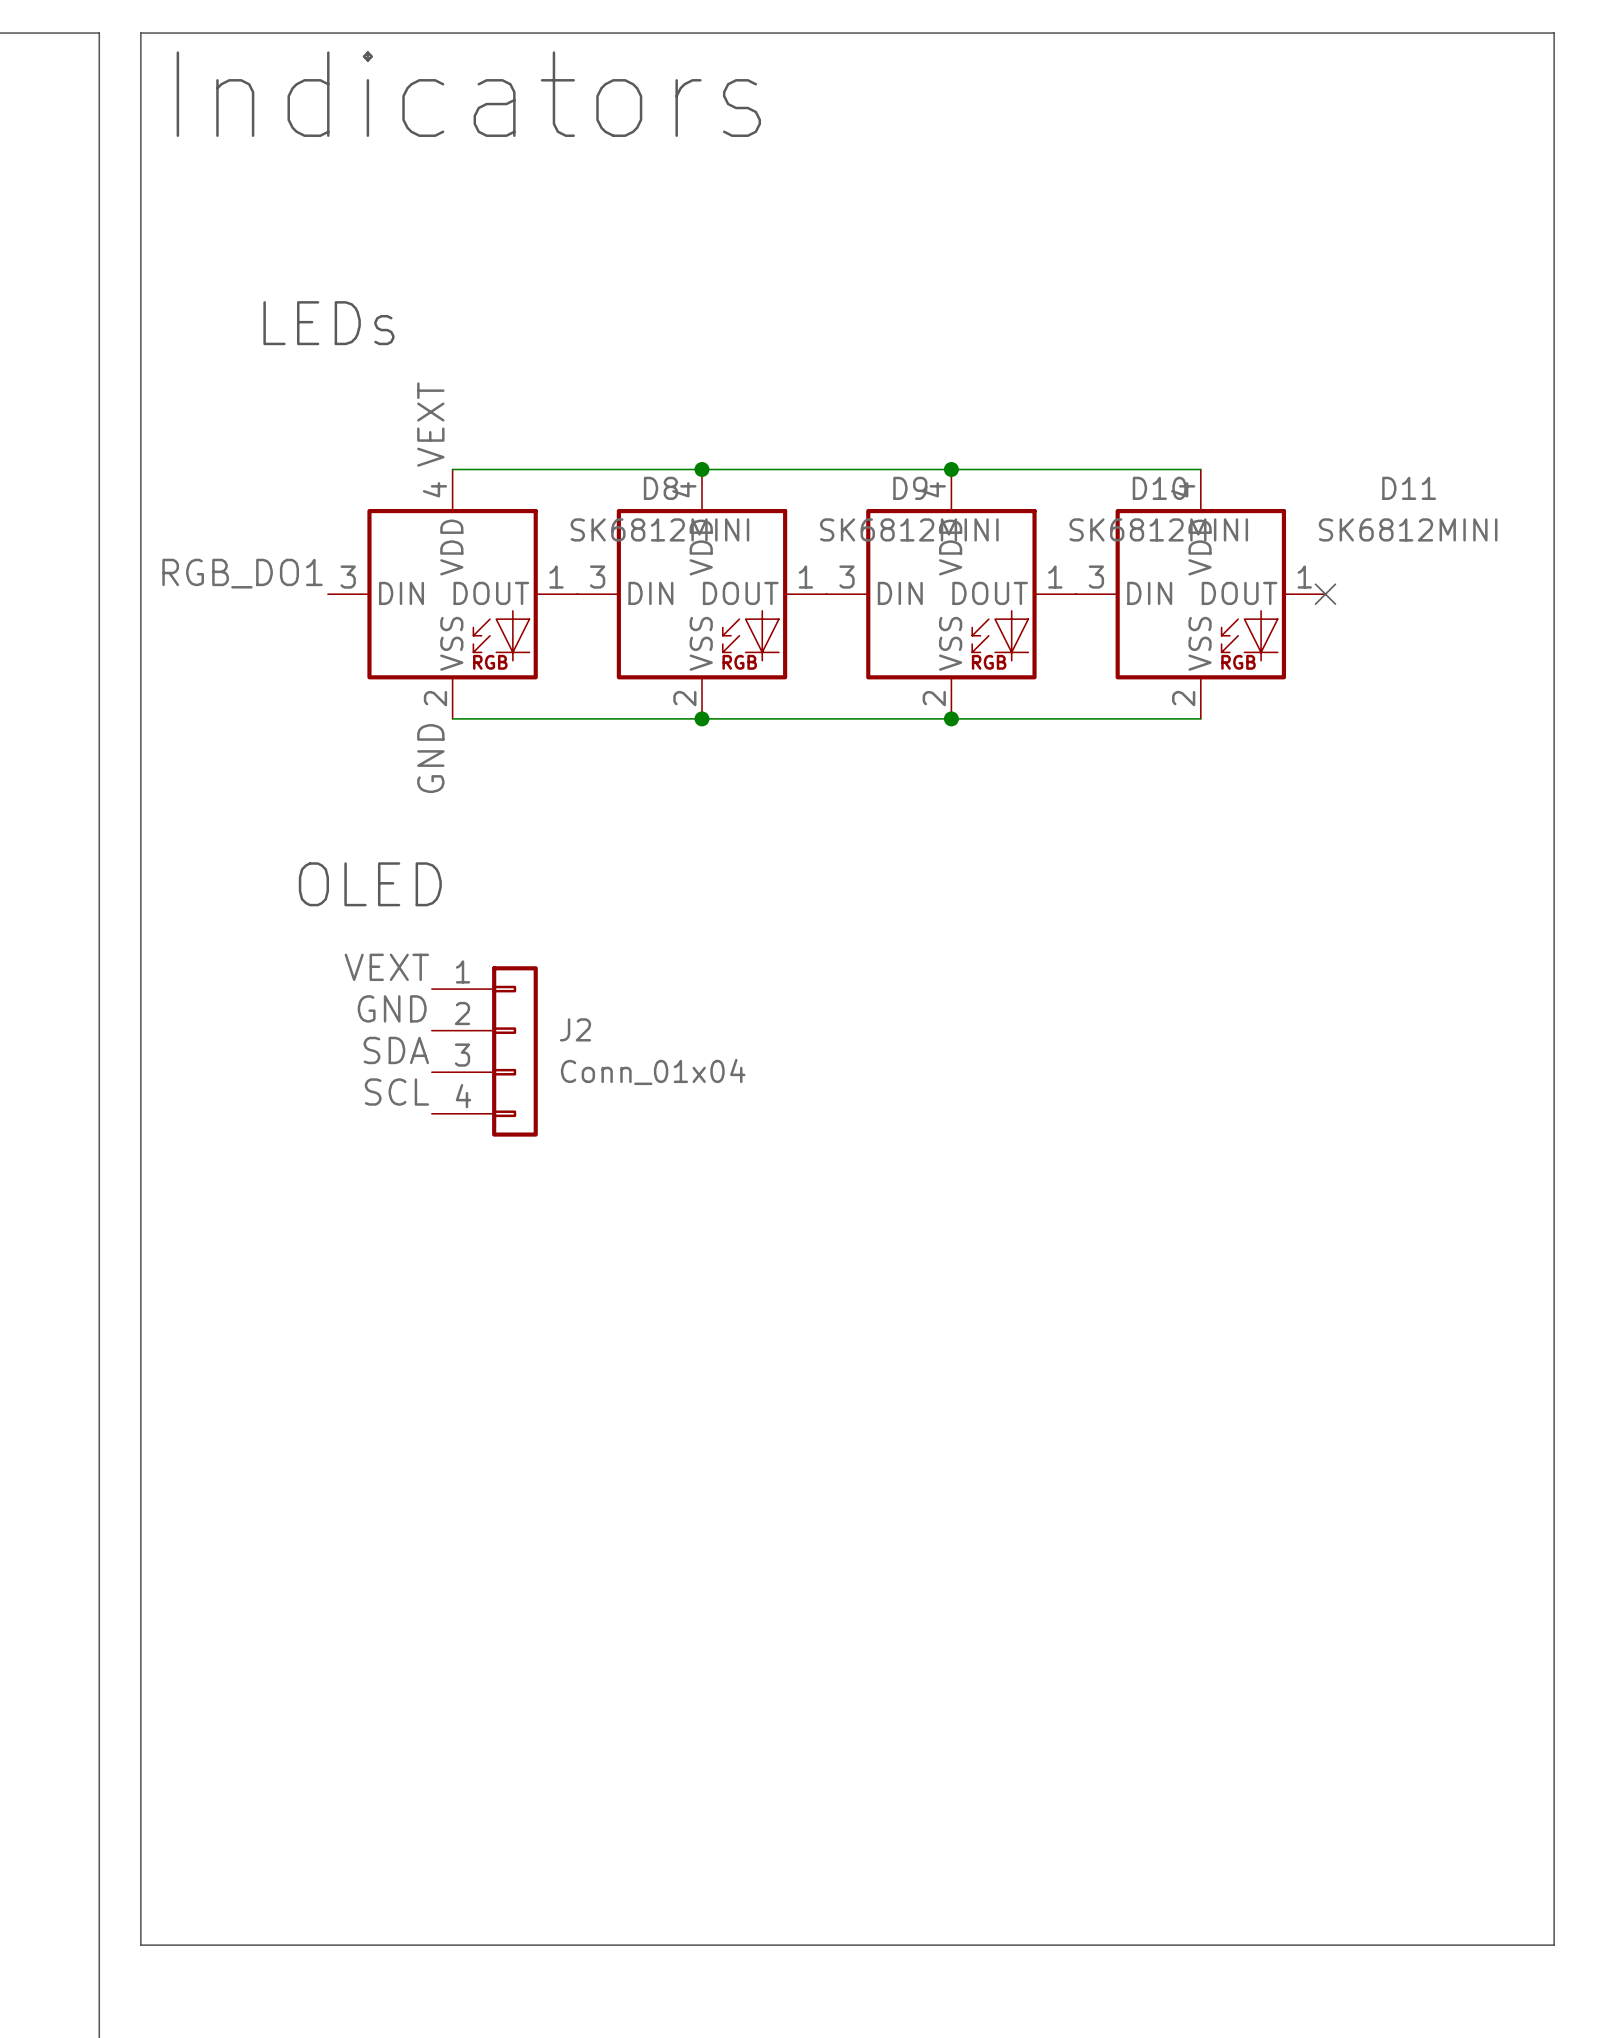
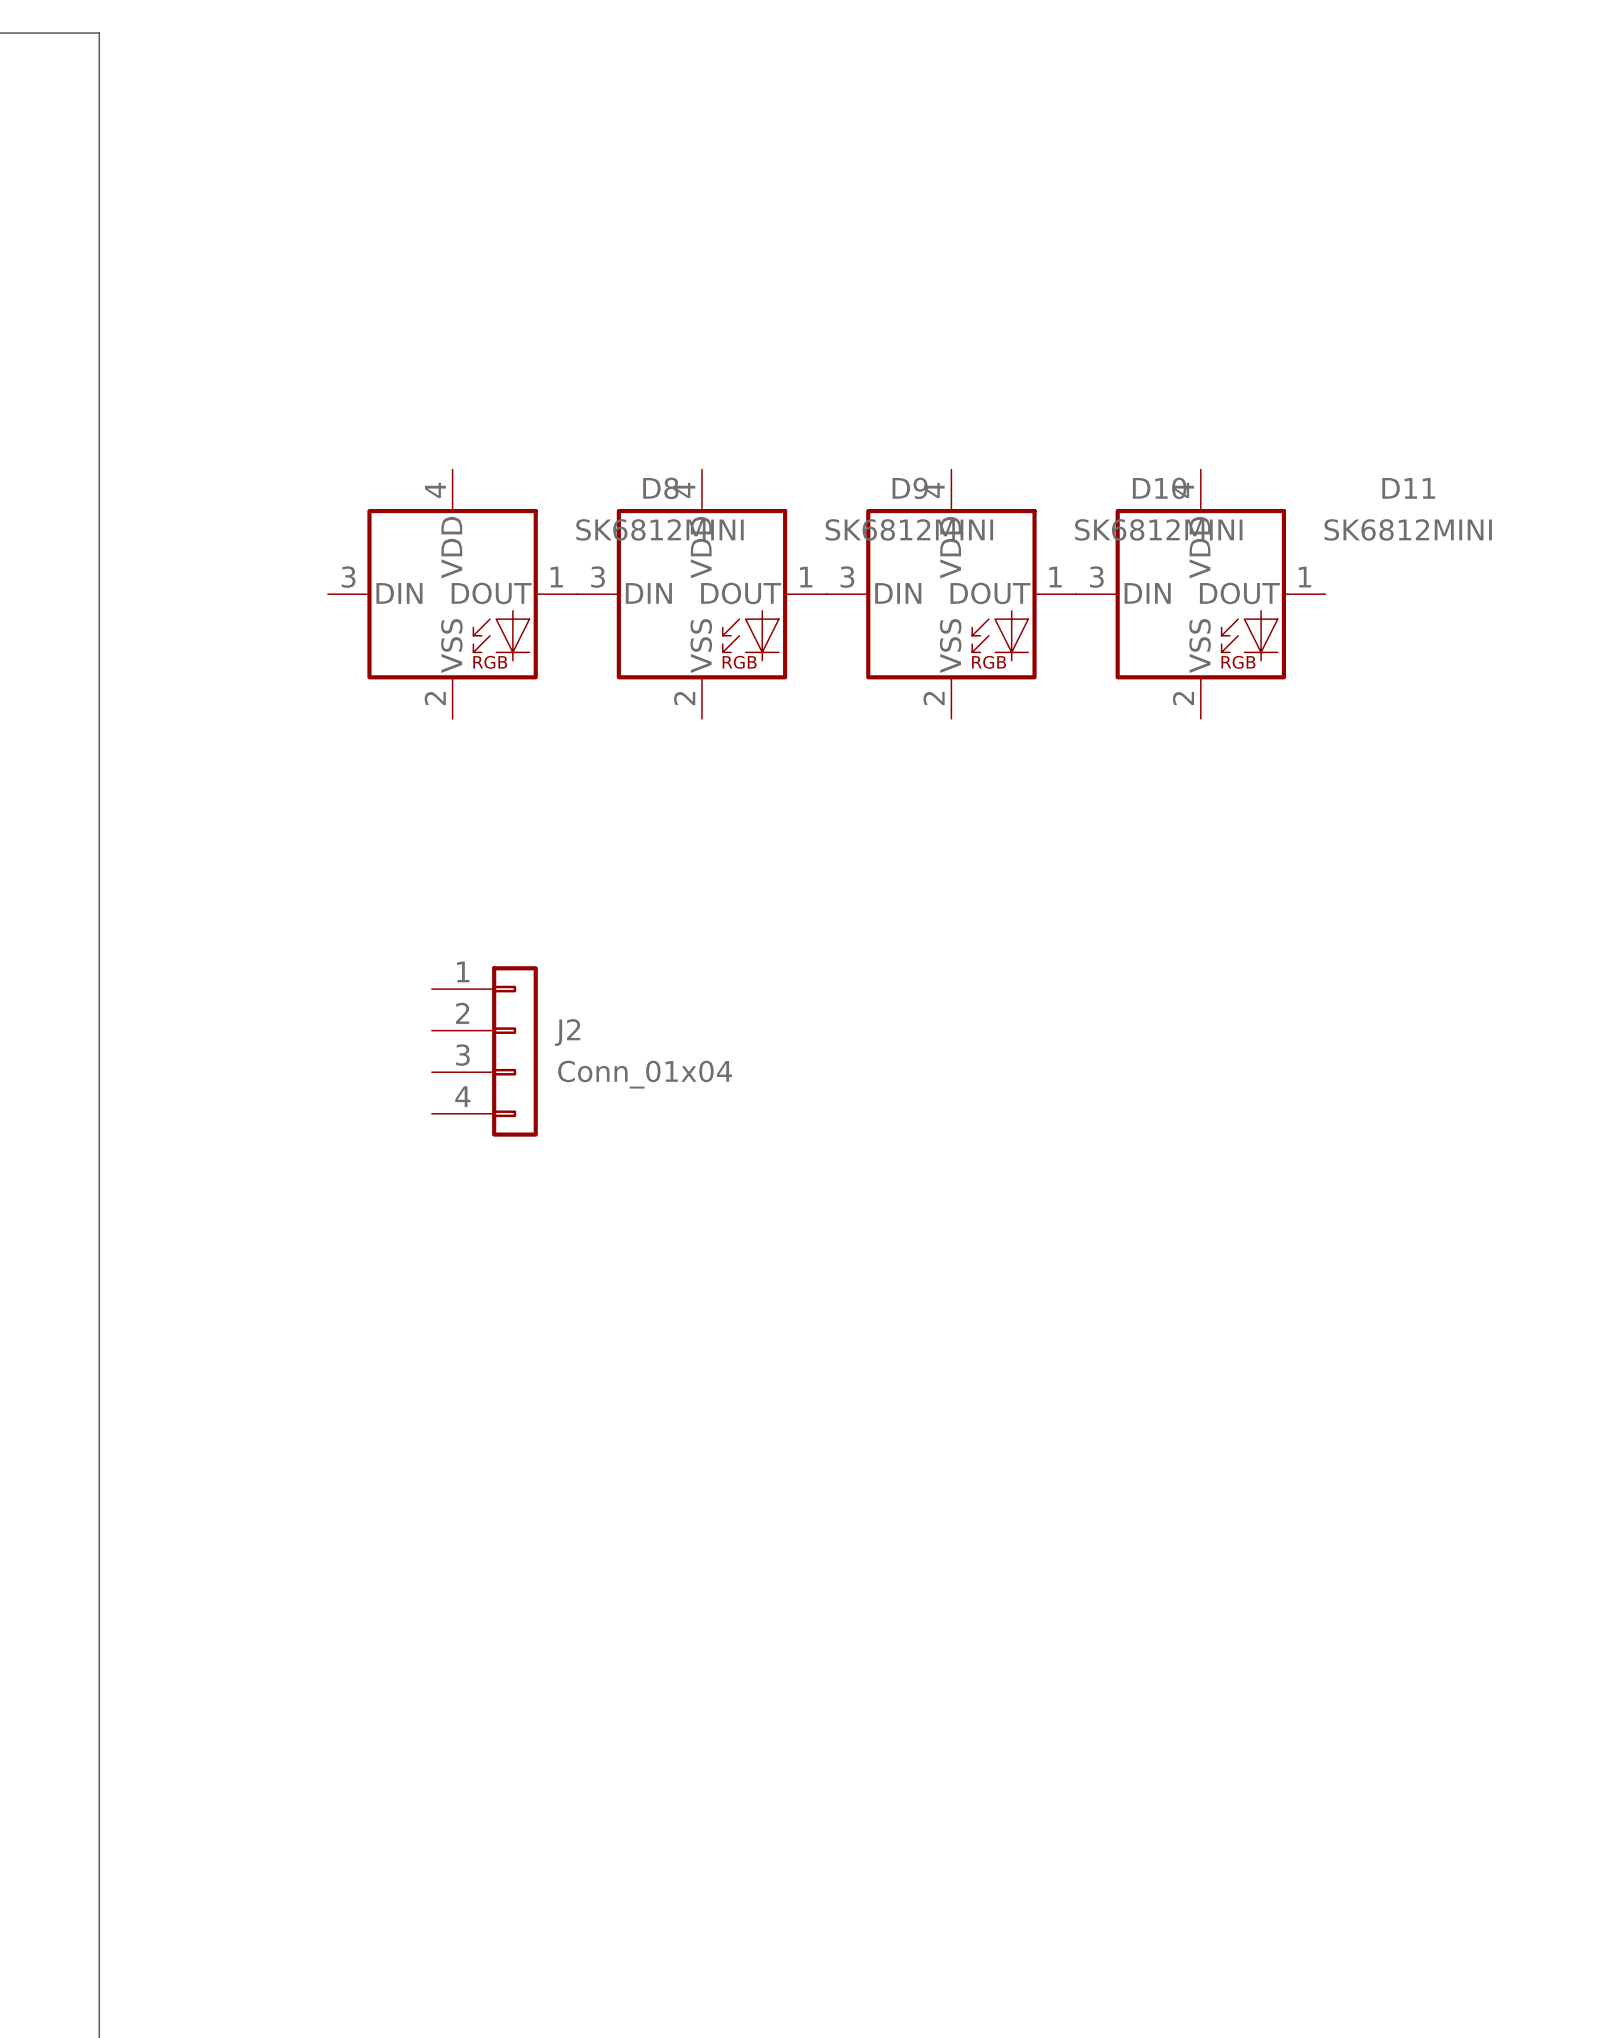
line: (140, 33) (1554, 33) (1554, 1945) (140, 1945) (140, 33) -> none
text: Indicators (468, 94) -> none
text: LEDs (328, 323) -> none
label: VEXT (430, 424) -> none
wire: (452, 469) (1200, 469) -> none
junction: (702, 469) -> none
junction: (951, 469) -> none
label: RGB_DO1 (242, 573) -> none
no-connect mark: (1325, 594) -> none
wire: (452, 718) (1200, 718) -> none
junction: (702, 718) -> none
junction: (951, 718) -> none
label: GND (430, 758) -> none
text: OLED (370, 884) -> none
label: VEXT (386, 967) -> none
label: GND (392, 1008) -> none
label: SDA (396, 1050) -> none
label: SCL (396, 1092) -> none

